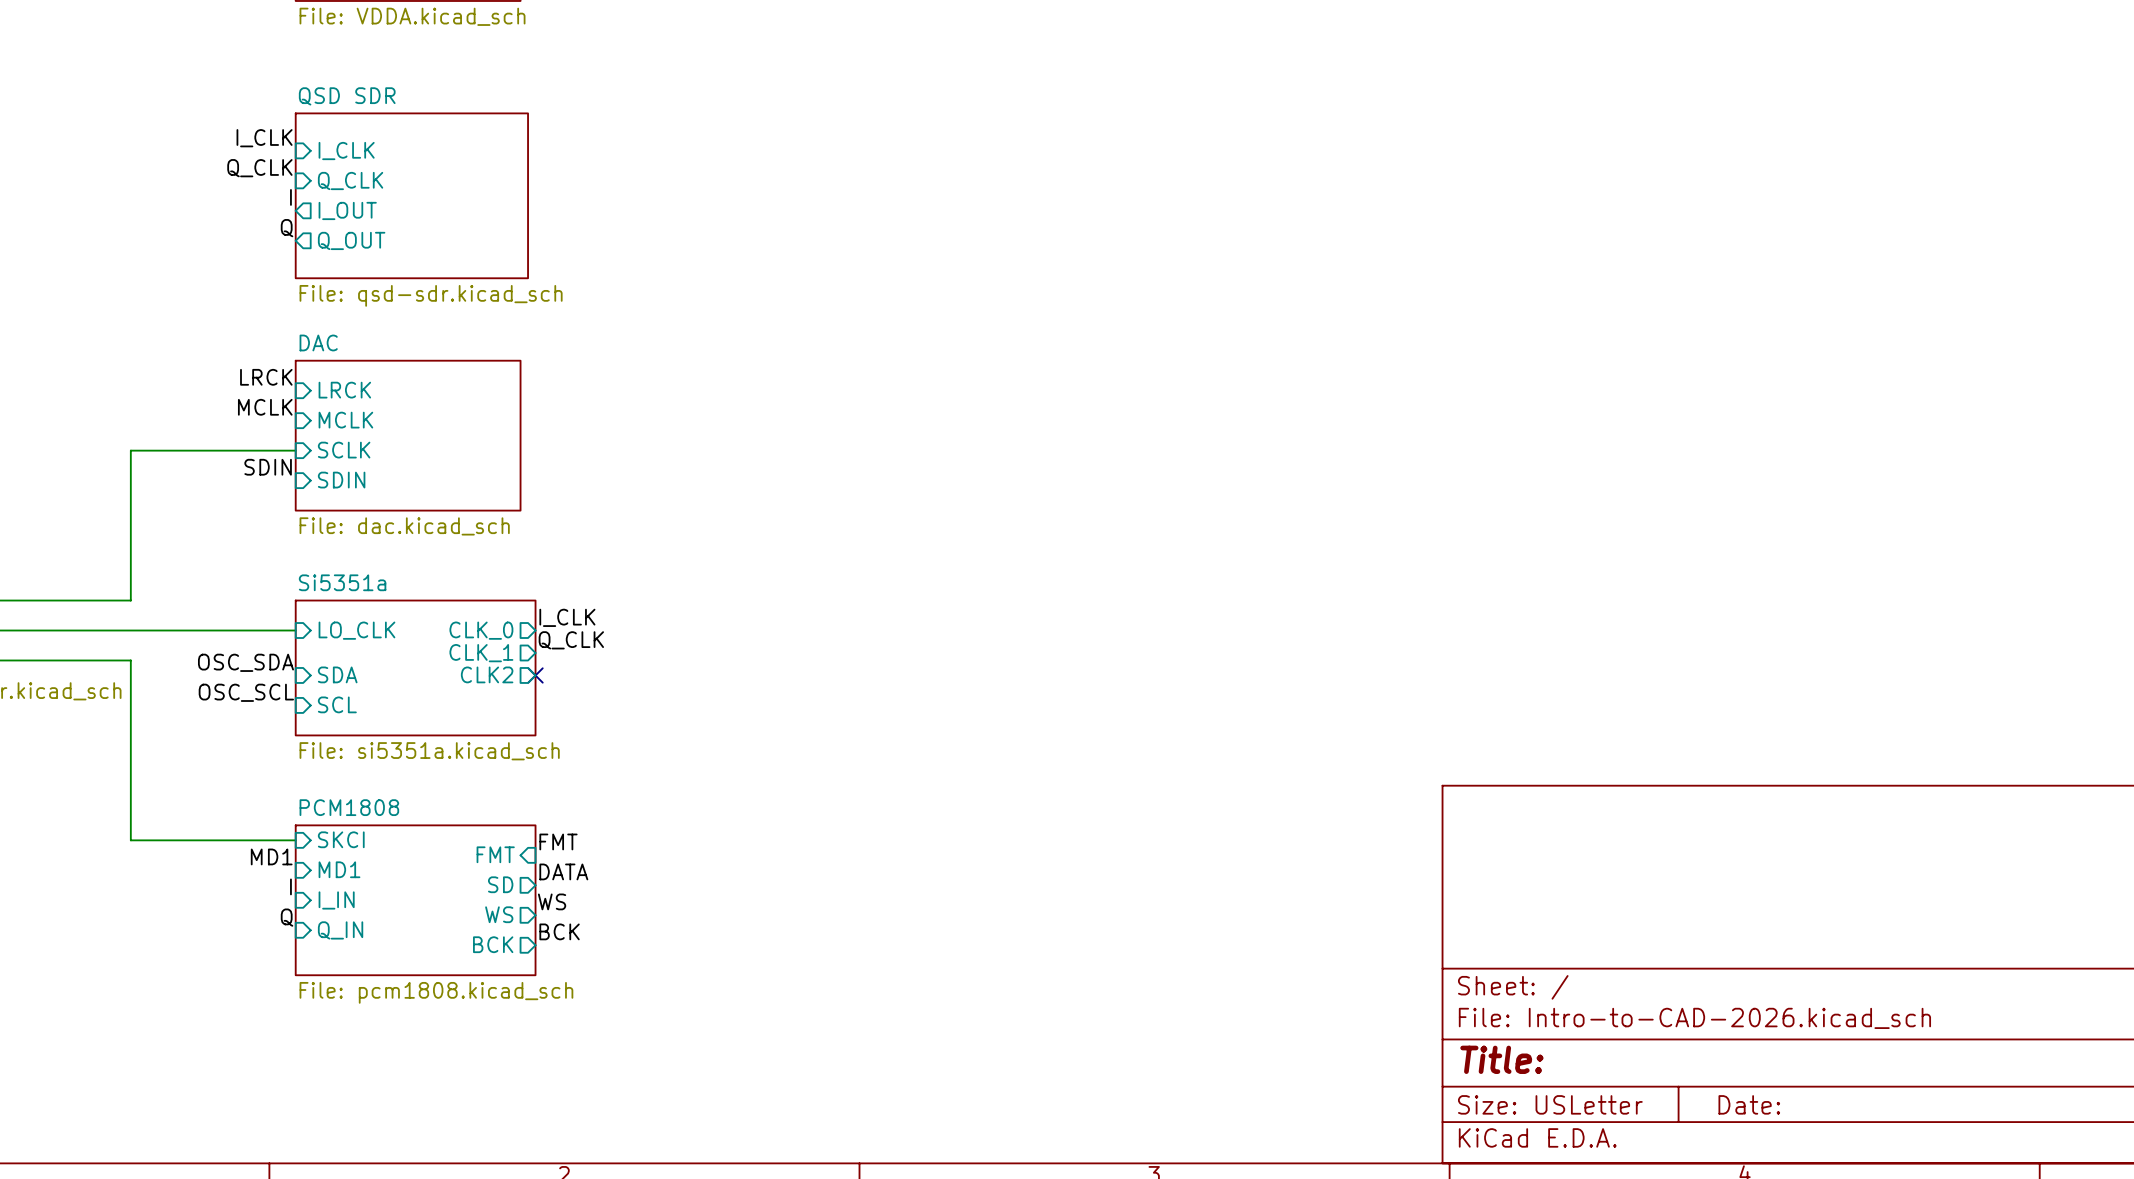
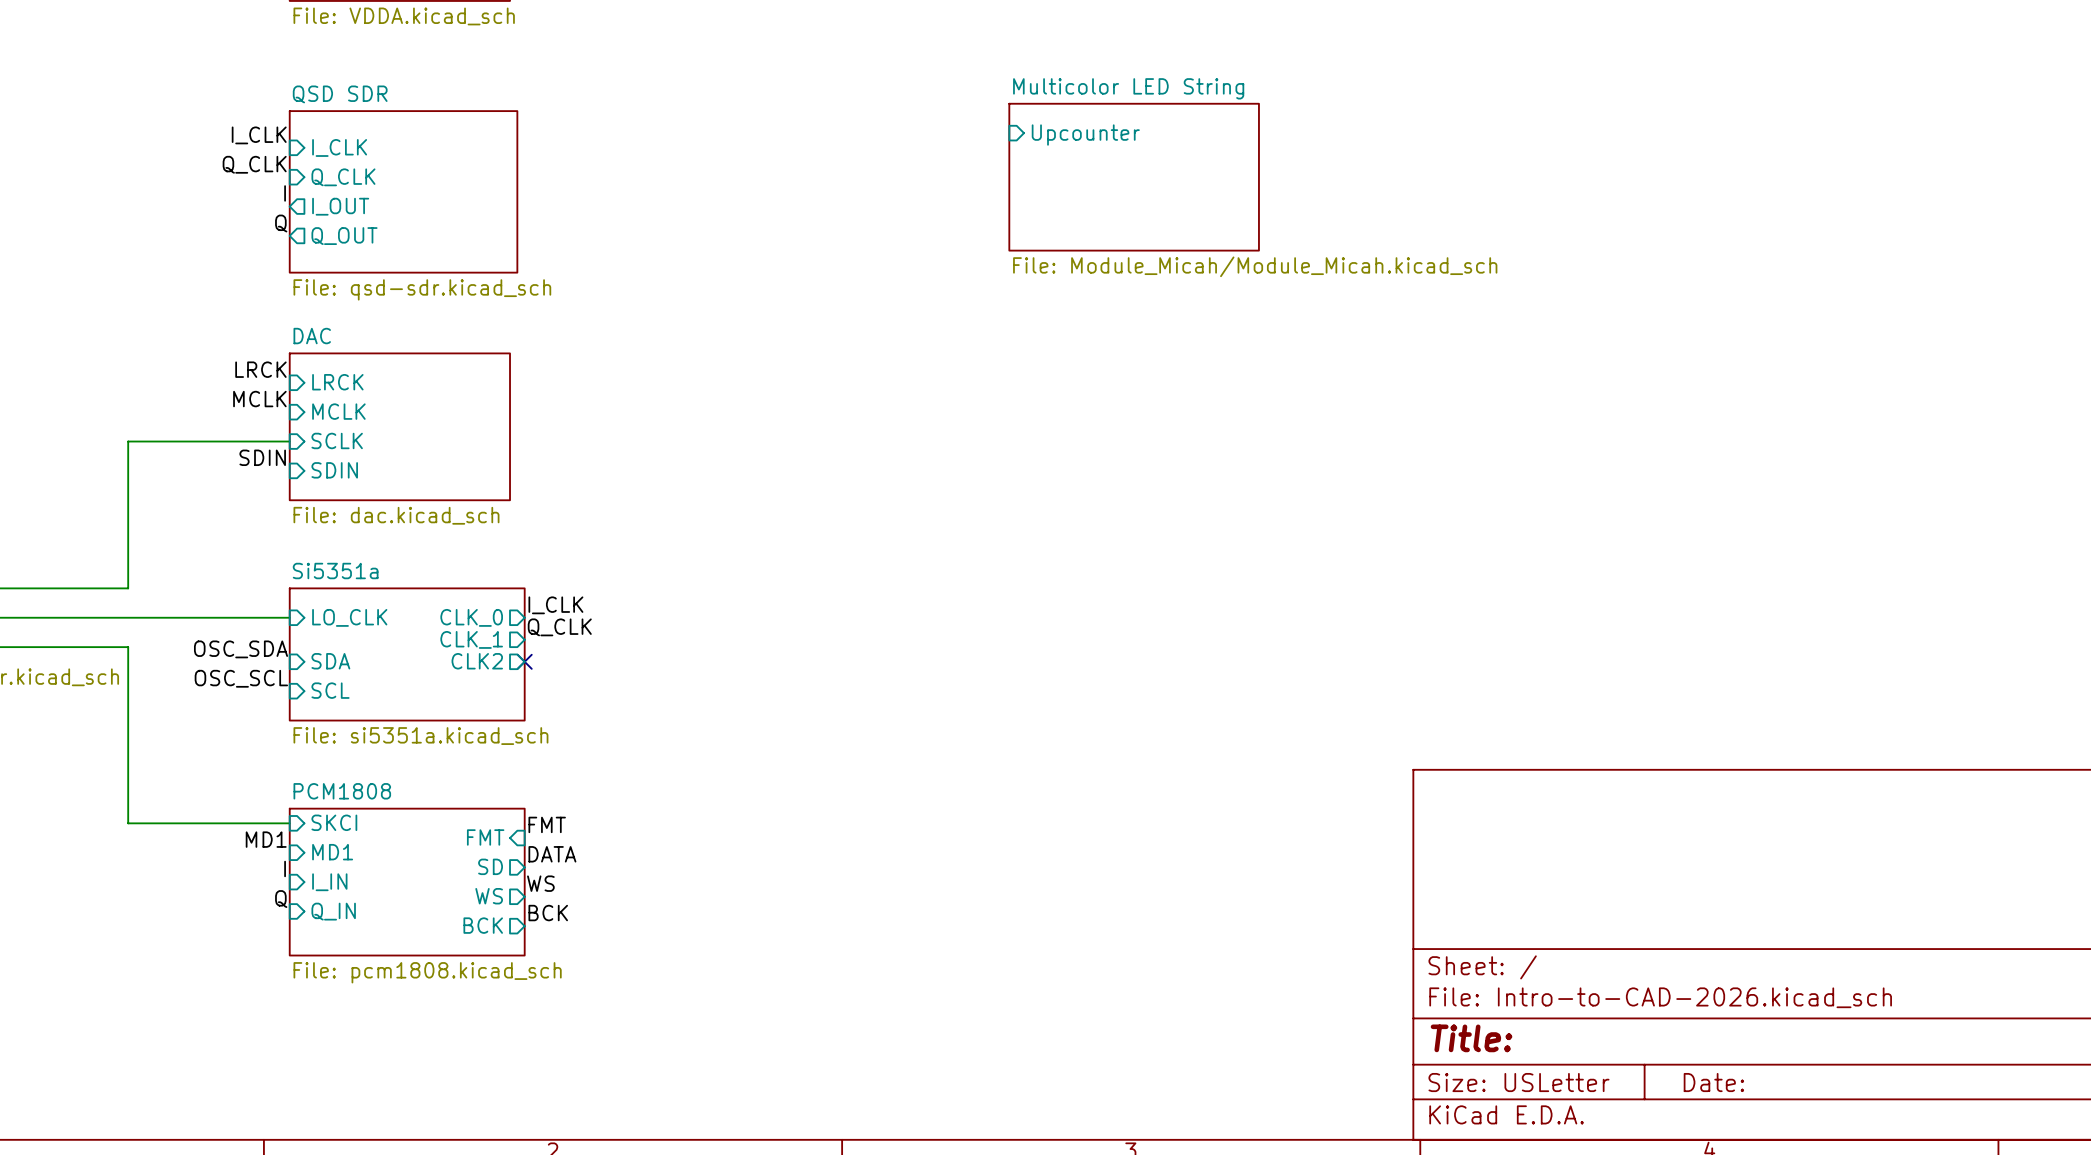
sheet pin: none -> Upcounter (1085, 135)
sheet Multicolor LED String: none -> File: Module_Micah/Module_Micah.kicad_sch (1134, 177)

